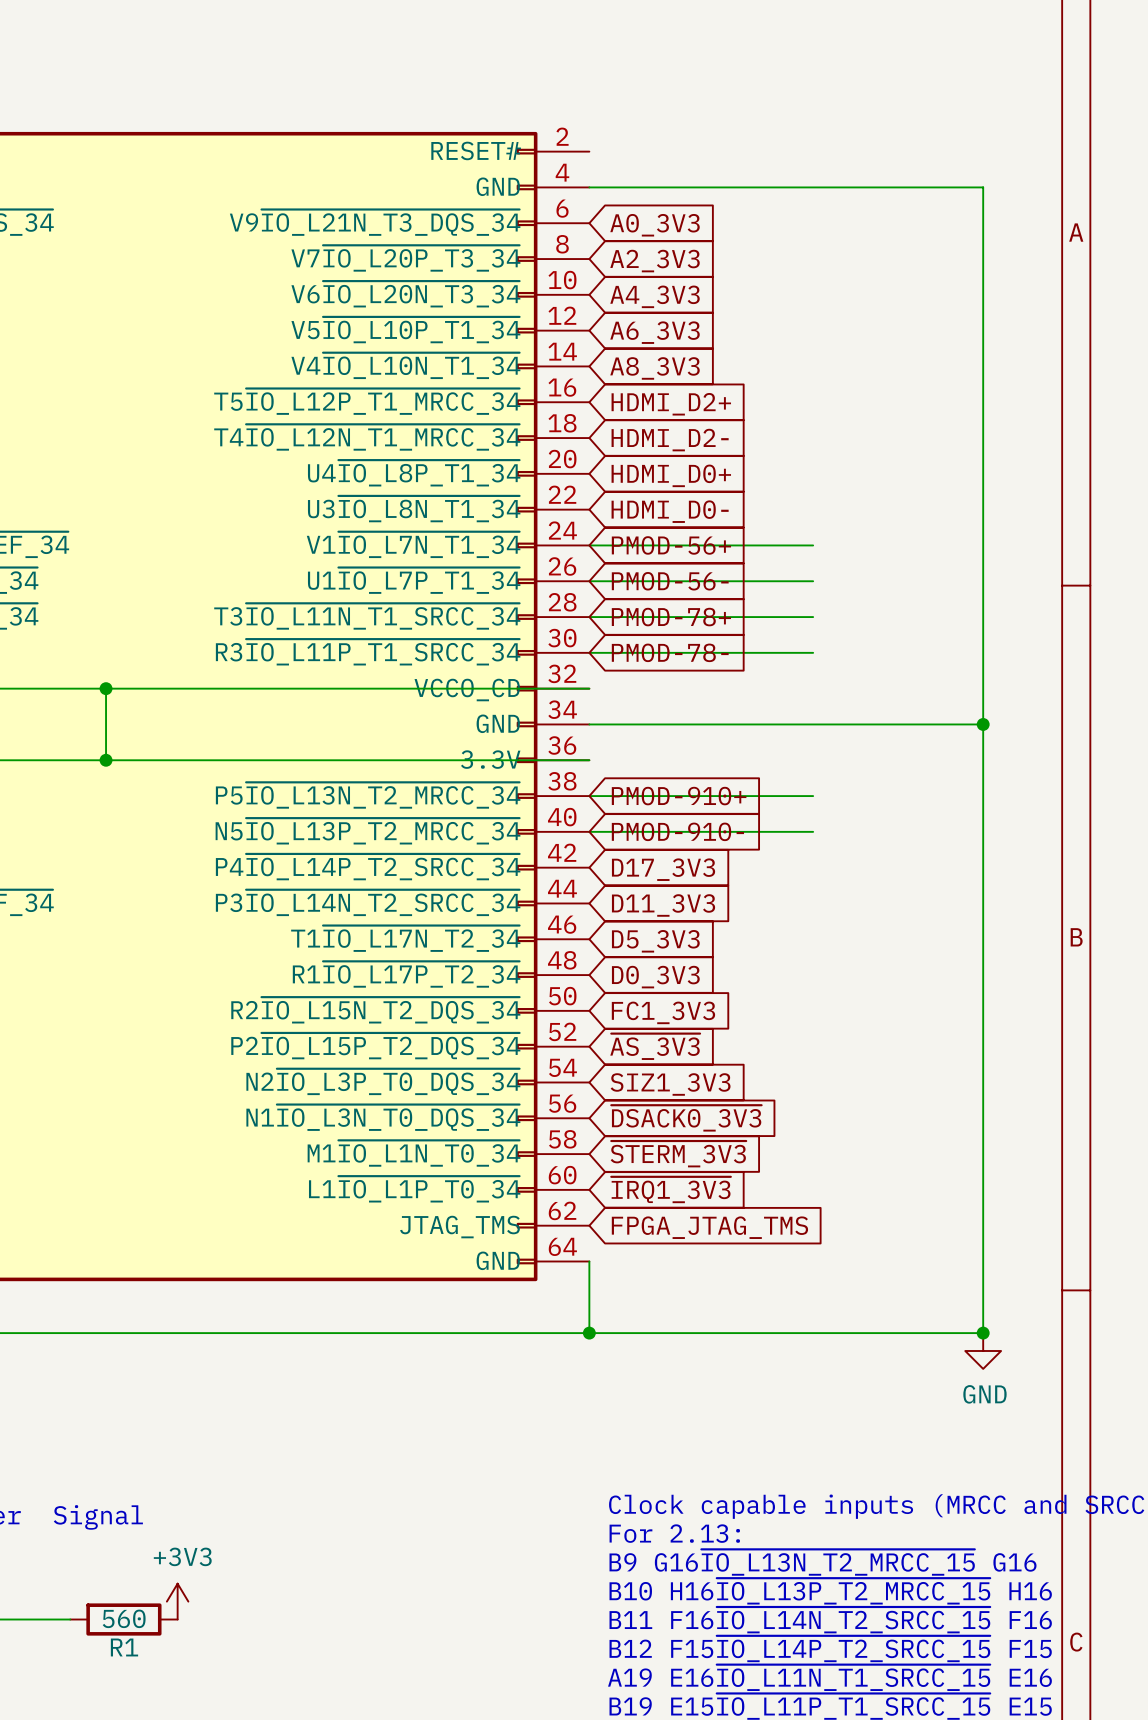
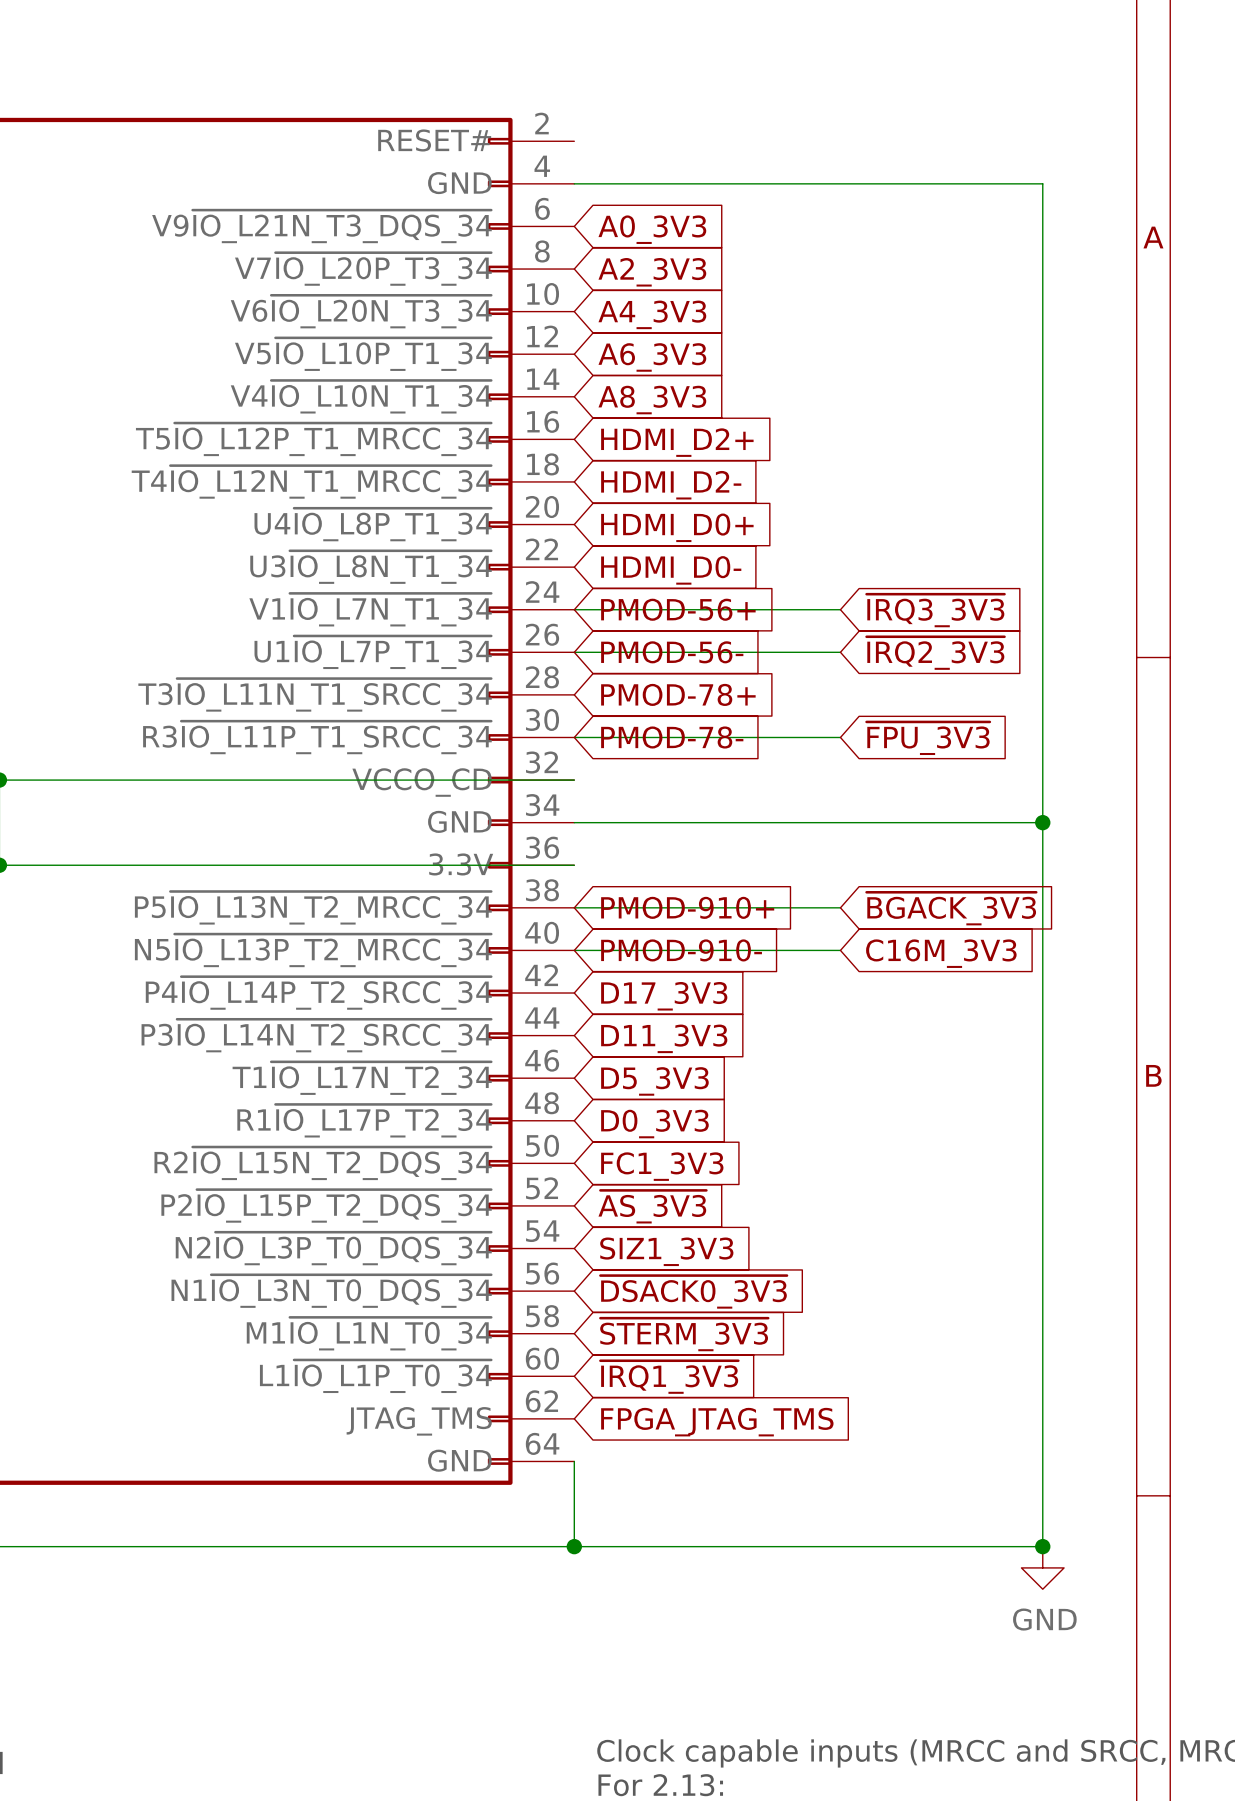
global label: none -> ~{IRQ3_3V3} (935, 610)
global label: none -> ~{IRQ2_3V3} (935, 653)
wire: (589, 617) (813, 617) -> none
global label: none -> ~{FPU_3V3} (928, 738)
global label: none -> ~{BGACK_3V3} (951, 908)
global label: none -> C16M_3V3 (941, 953)

